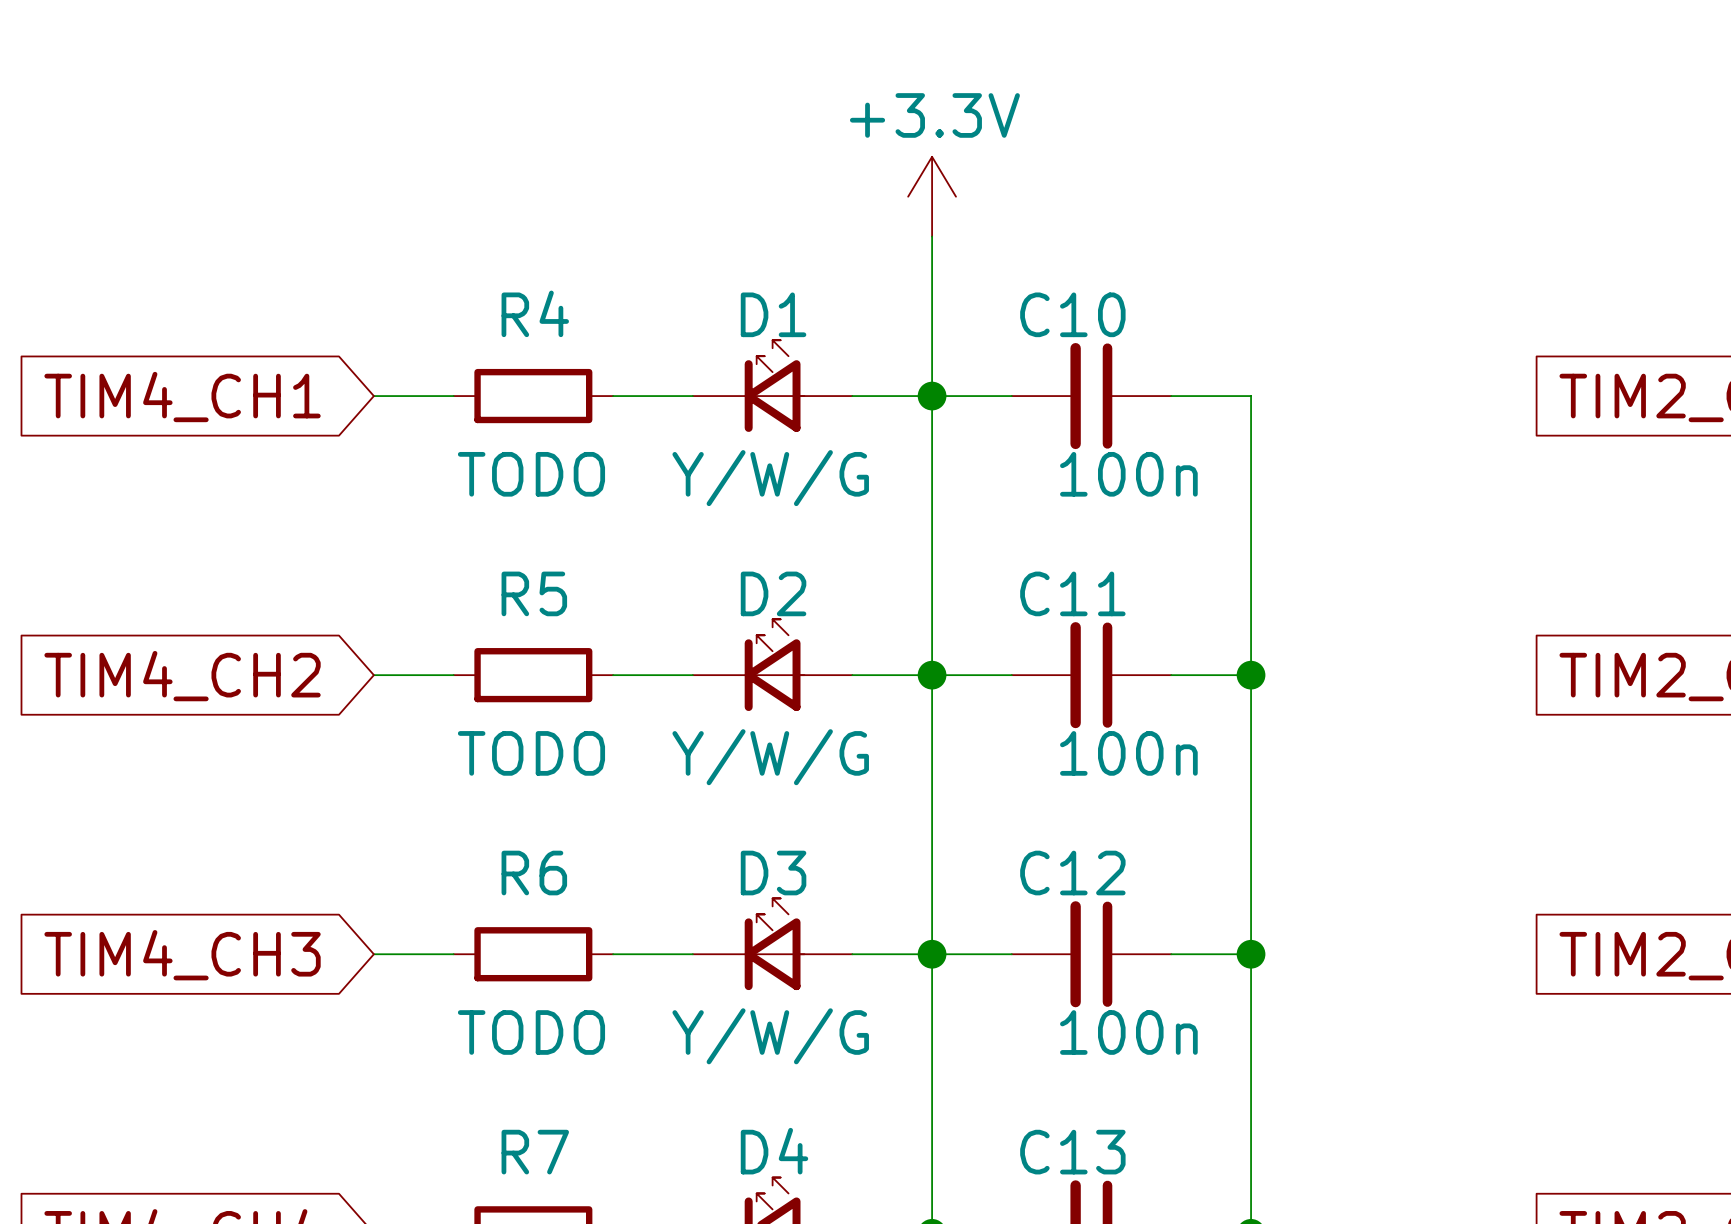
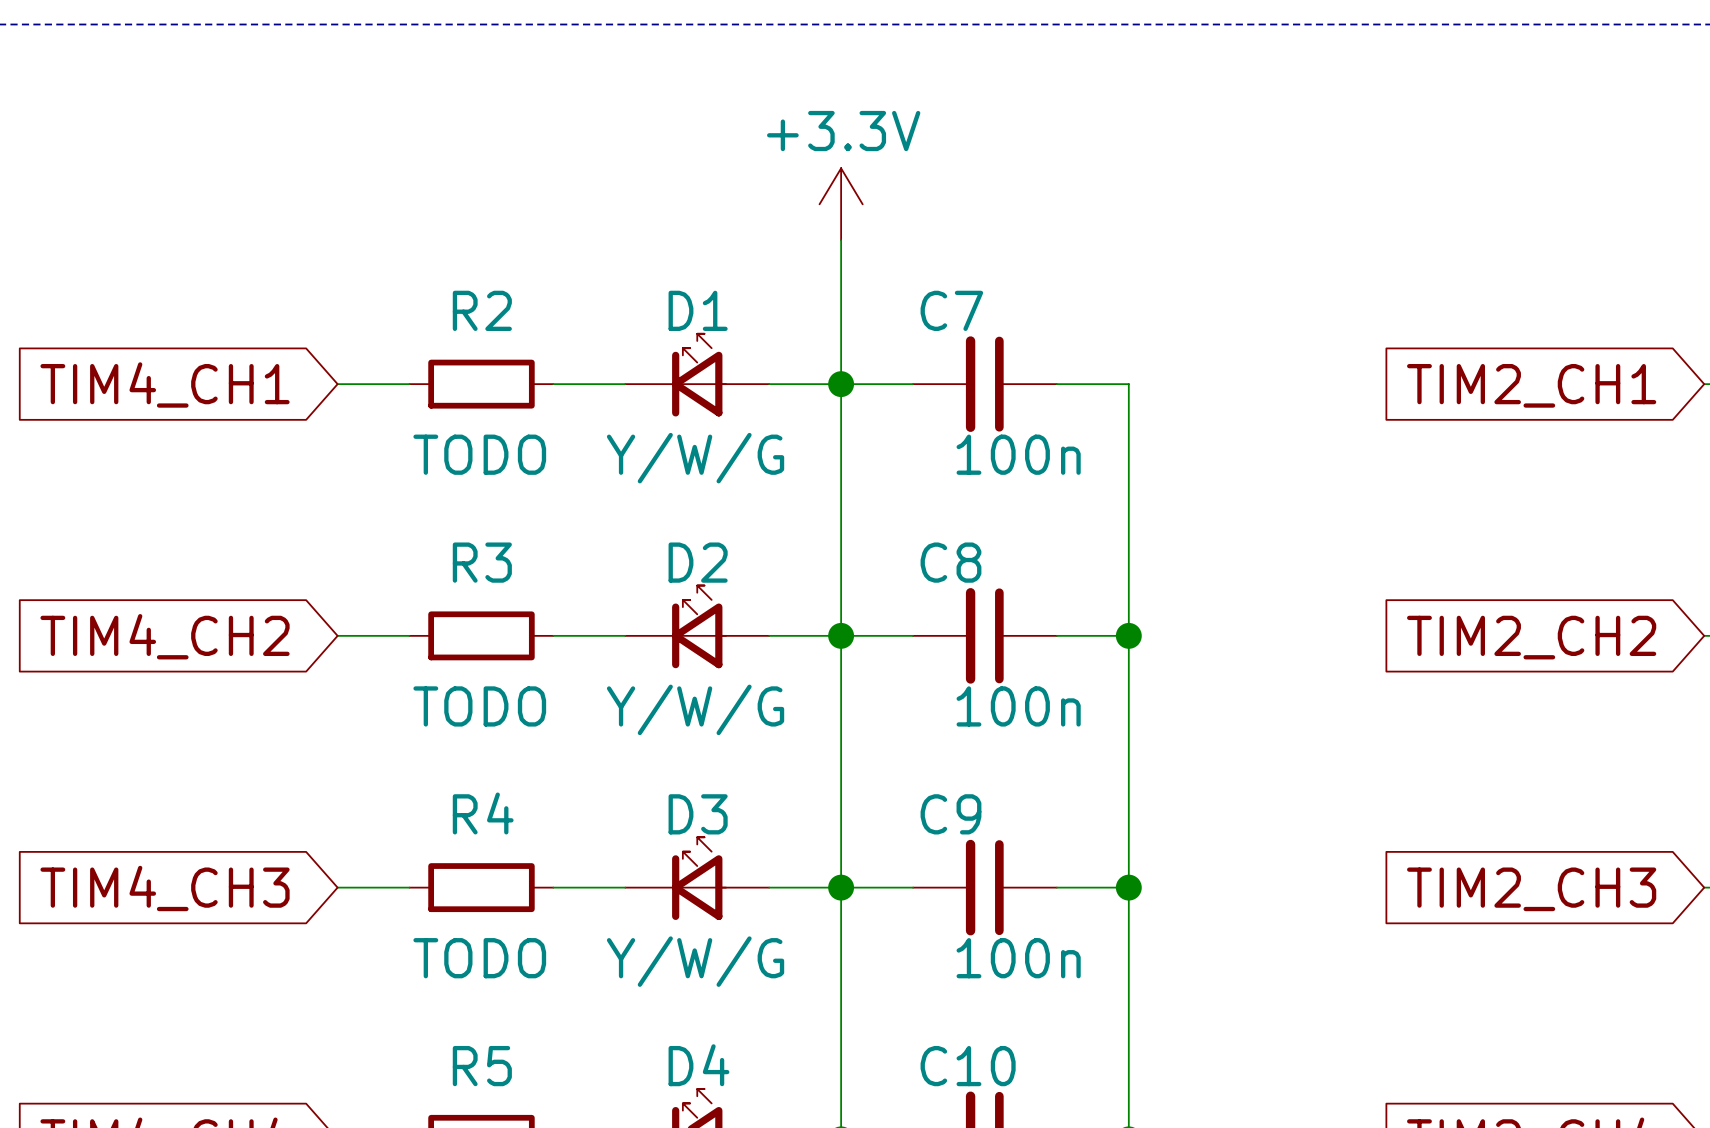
R4 name: R4 (535, 313) -> R2 (482, 310)
C10 name: C10 (1072, 314) -> C7 (951, 310)
R5 name: R5 (534, 593) -> R3 (482, 562)
C11 name: C11 (1072, 593) -> C8 (950, 562)
R6 name: R6 (534, 873) -> R4 (483, 813)
C12 name: C12 (1072, 873) -> C9 (950, 814)
R7 name: R7 (535, 1152) -> R5 (482, 1066)
C13 name: C13 (1072, 1152) -> C10 (968, 1066)

